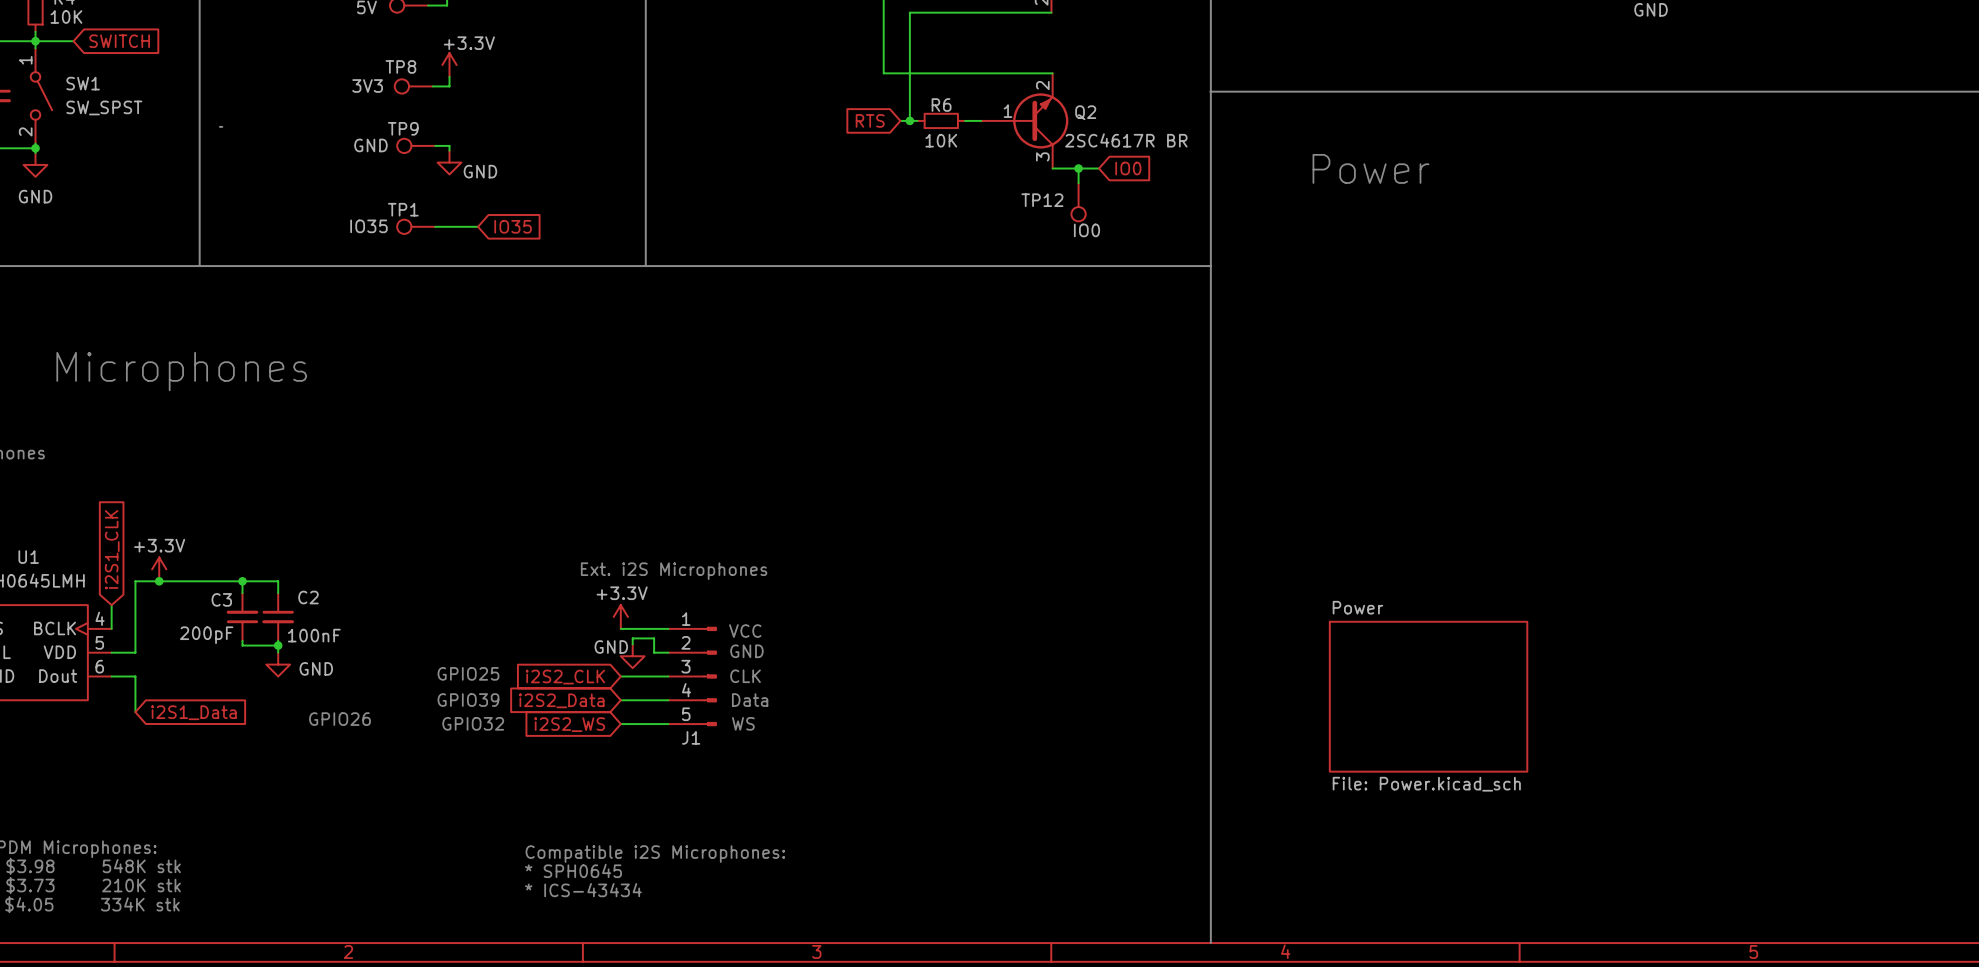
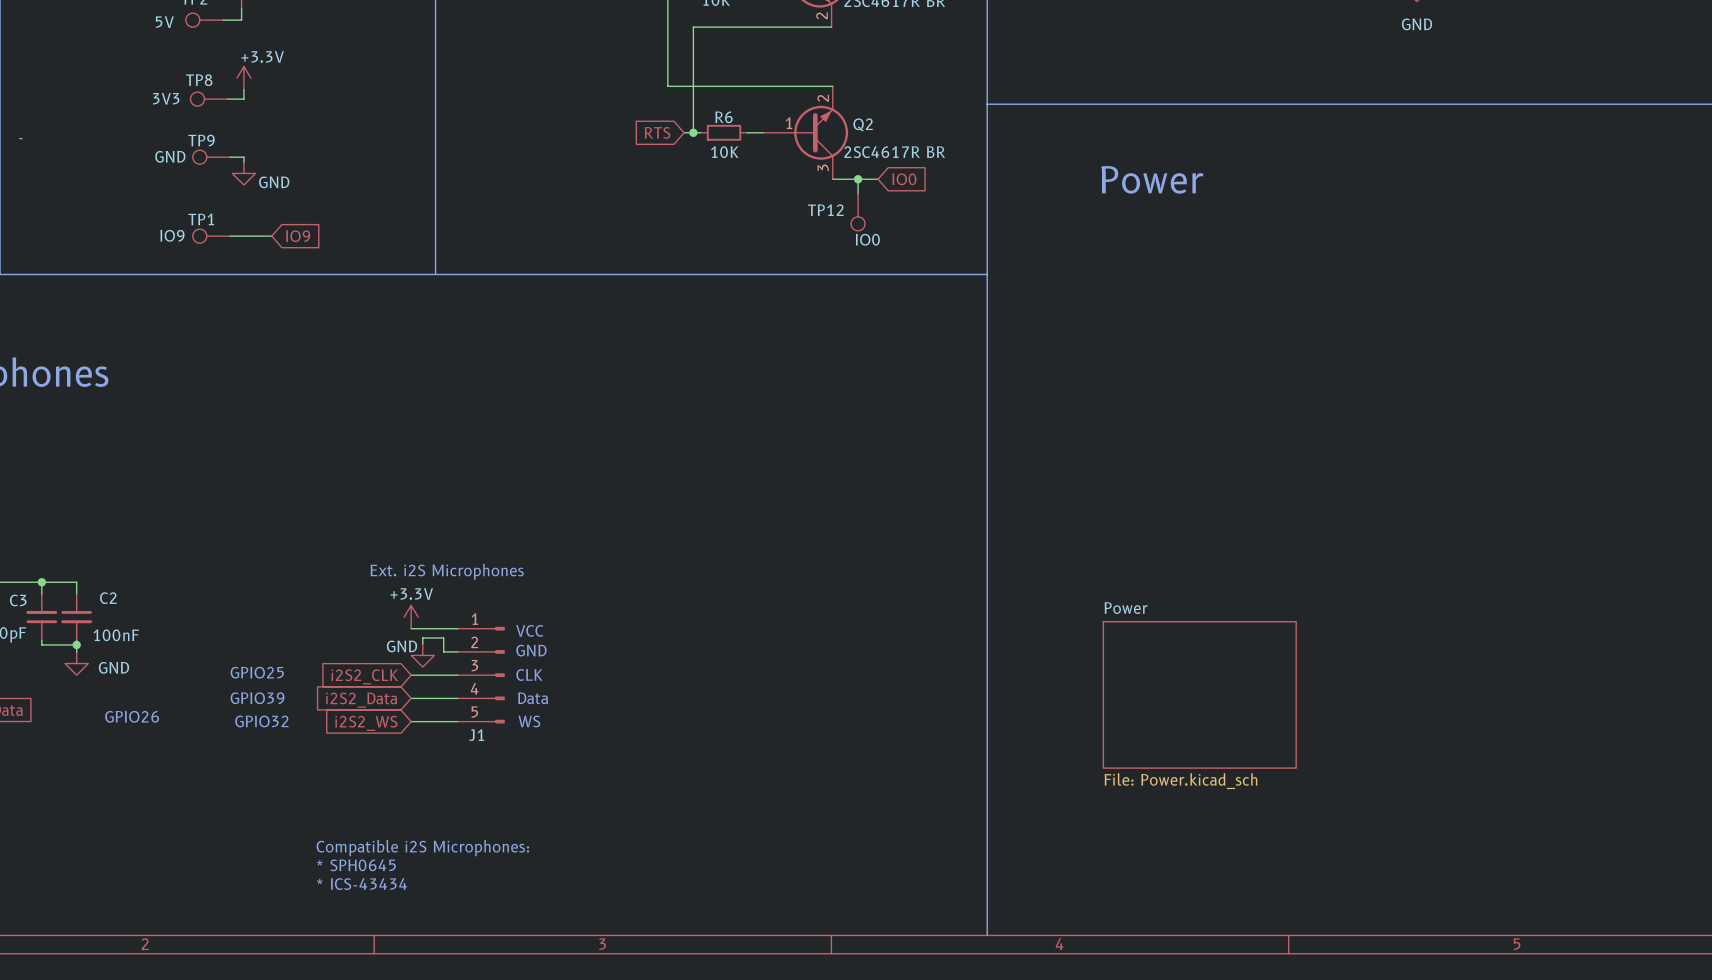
TP1 value: IO35 (368, 226) -> IO9 (172, 235)
global label: IO35 (513, 226) -> IO9 (298, 236)

